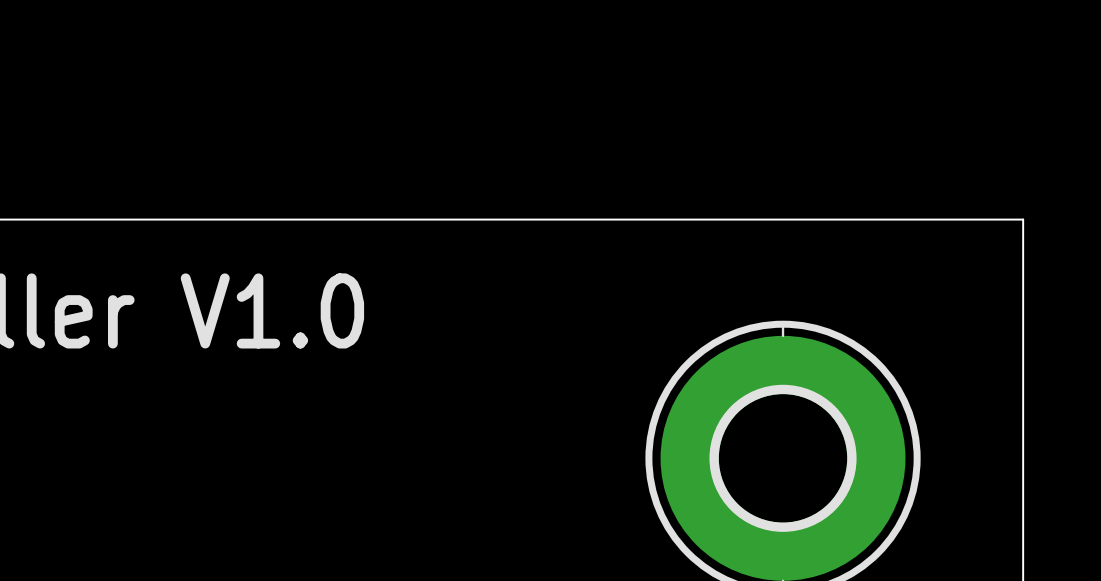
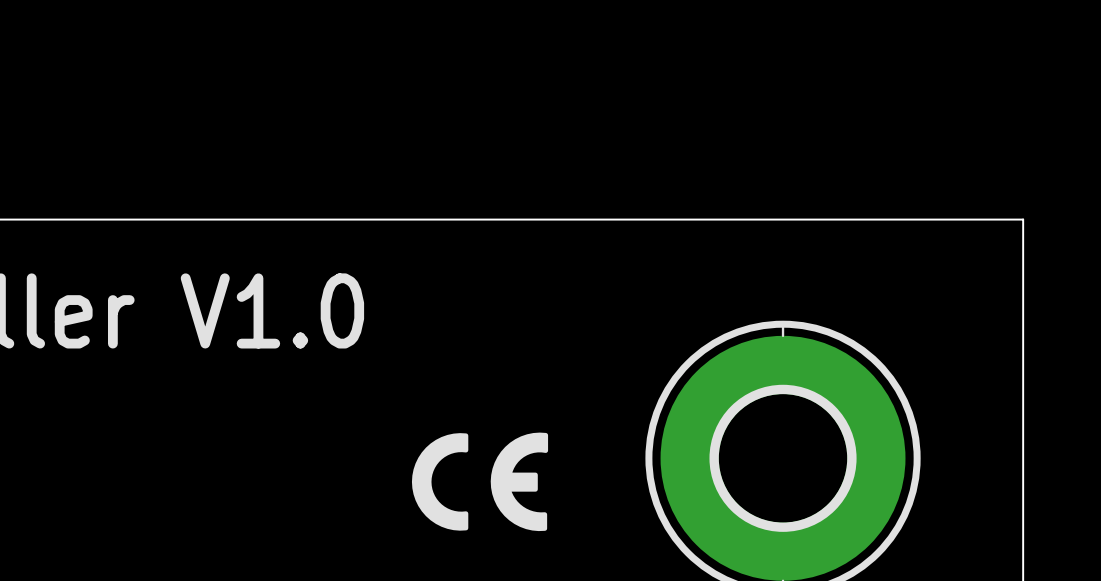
drawing: none -> [411, 432, 549, 532]

